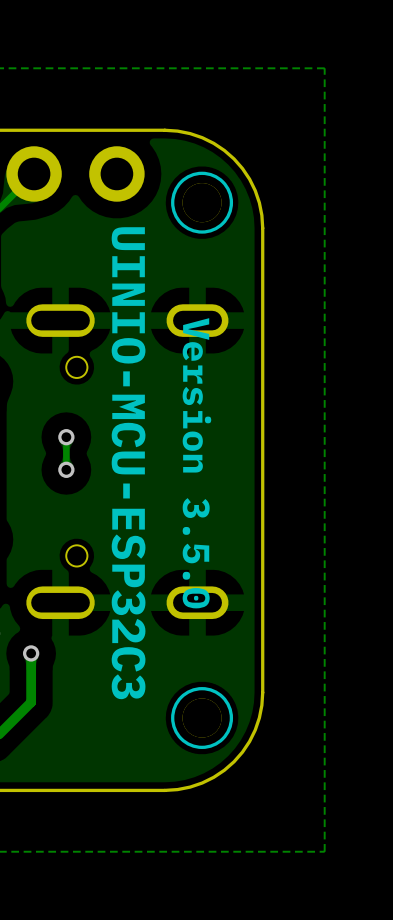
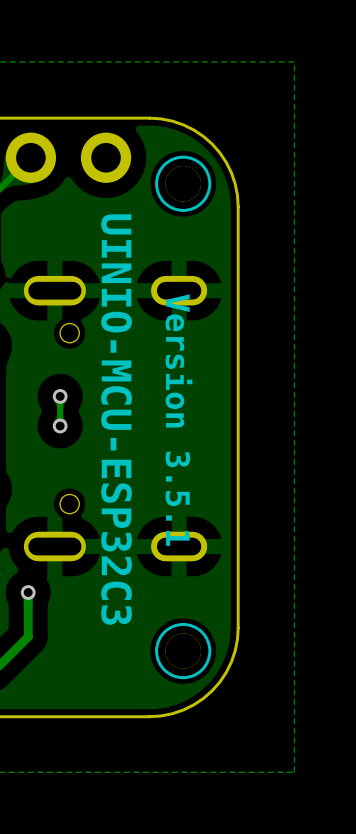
text: Version 3.5.0 (196, 463) -> Version 3.5.1 (179, 420)

